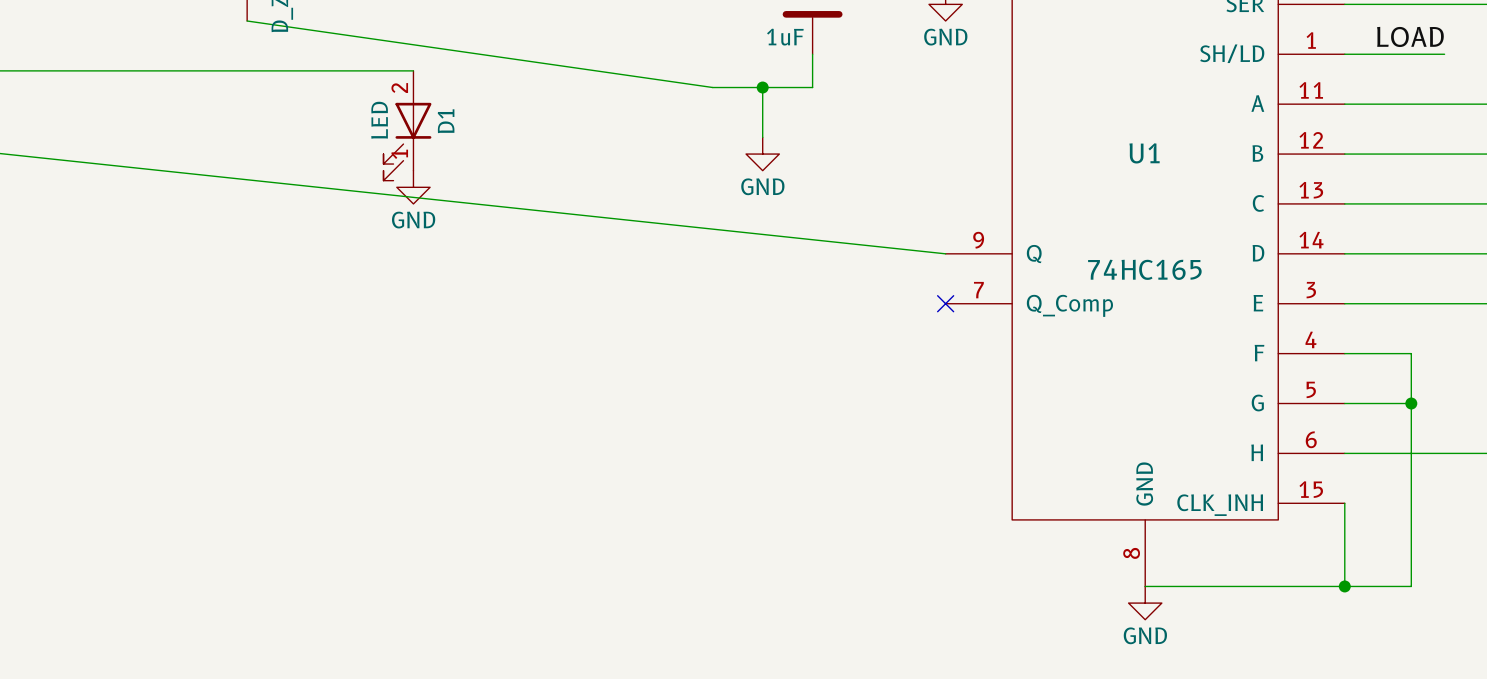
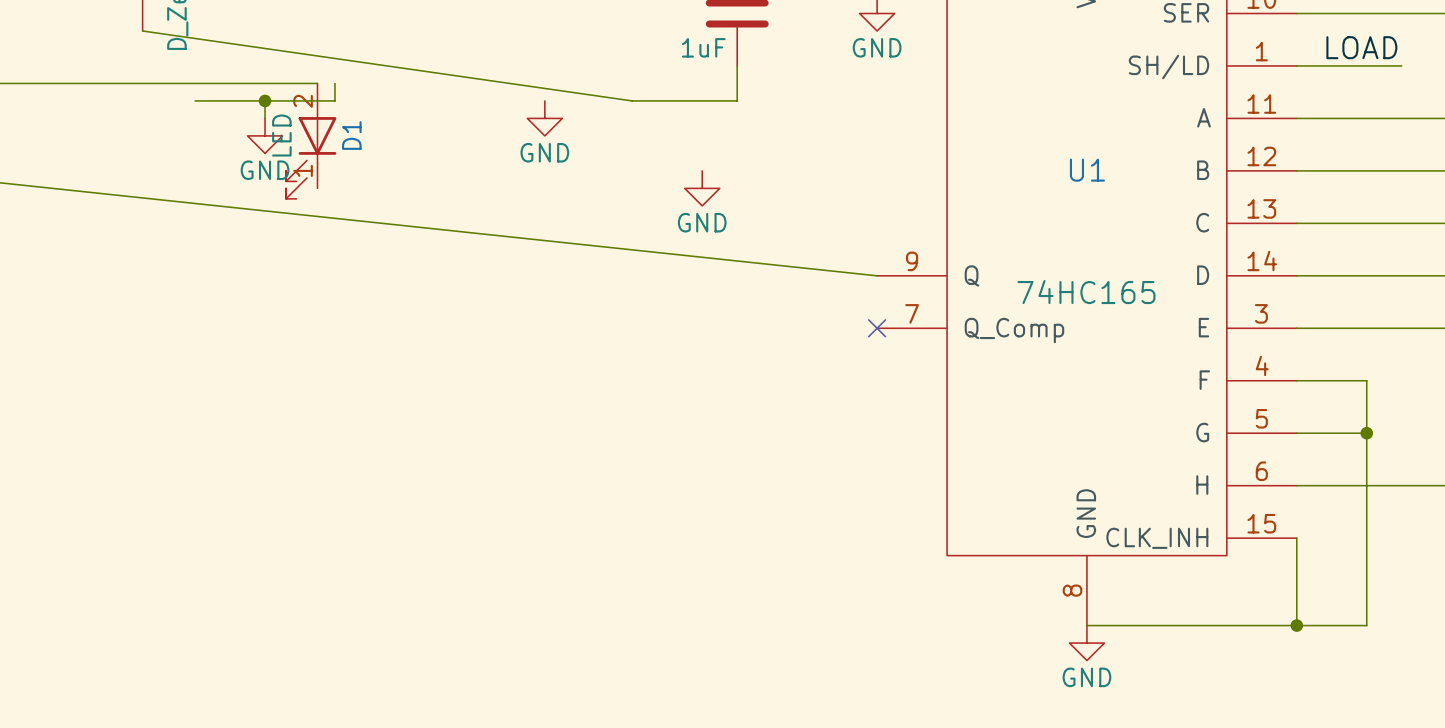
wire: none -> (334, 83) (334, 100) (195, 100)
wire: none -> (265, 100) (265, 118)
junction: none -> (265, 100)
wire: (762, 87) (762, 137) -> none
junction: (762, 87) -> none
power symbol: none -> GND (544, 118)
power symbol position: GND (762, 154) -> GND (702, 188)
power symbol position: GND (413, 187) -> GND (265, 135)

